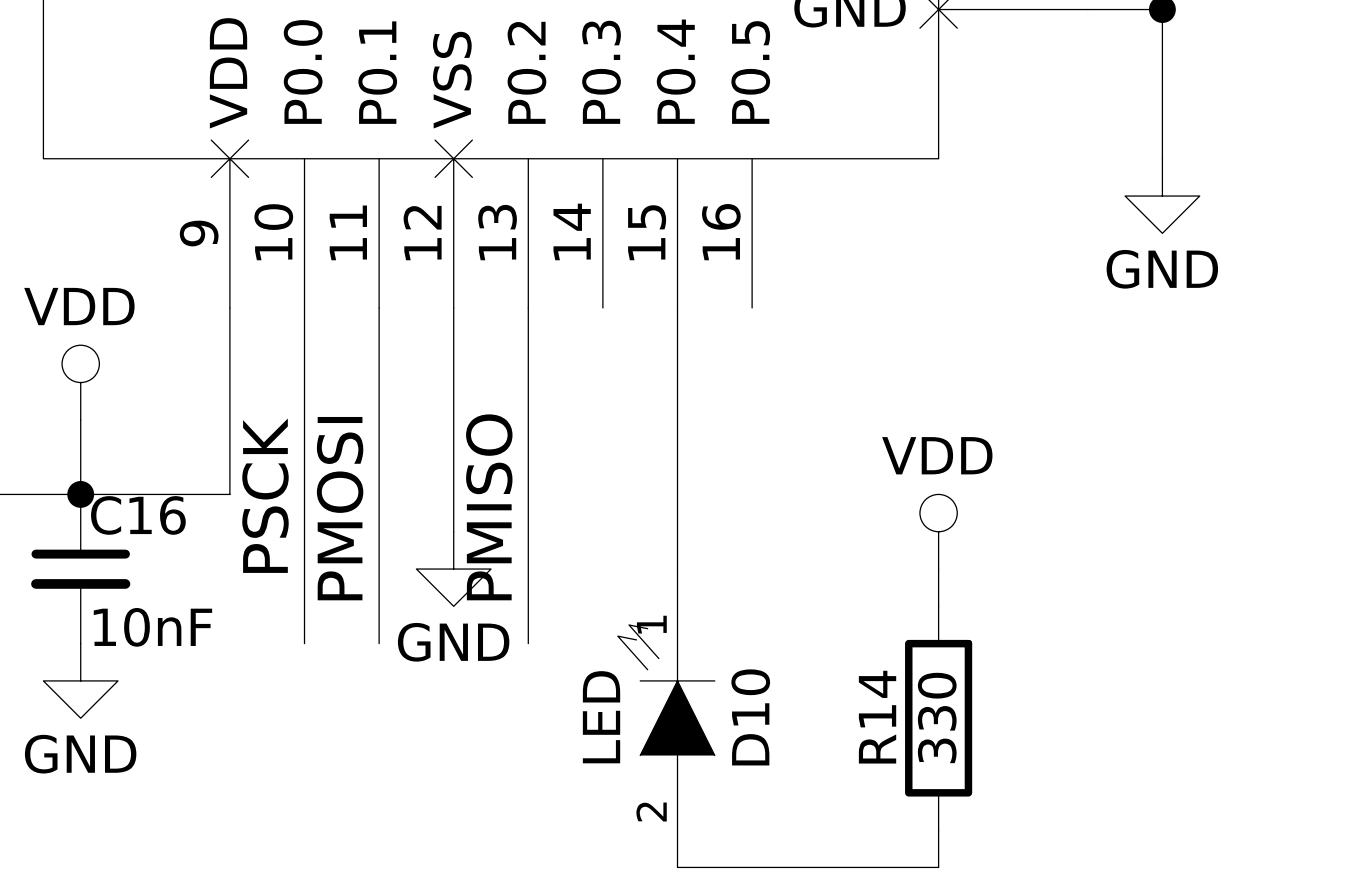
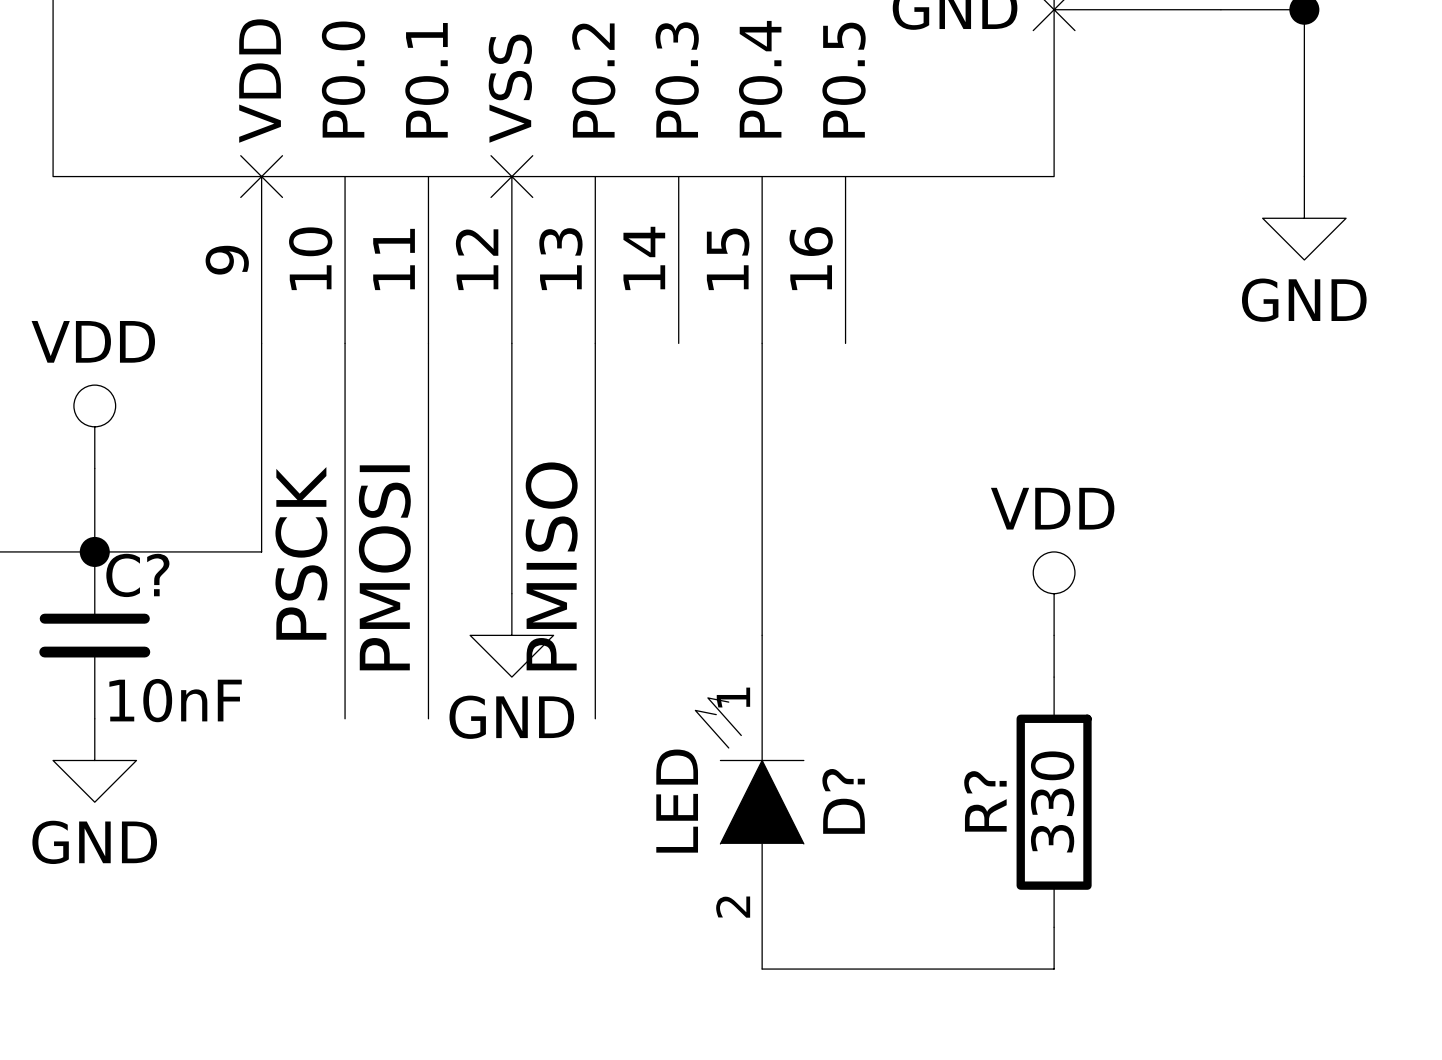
C16 name: C16 (138, 515) -> C? (137, 575)
D10 name: D10 (750, 717) -> D? (843, 801)
R14 name: R14 (877, 717) -> R? (985, 801)

